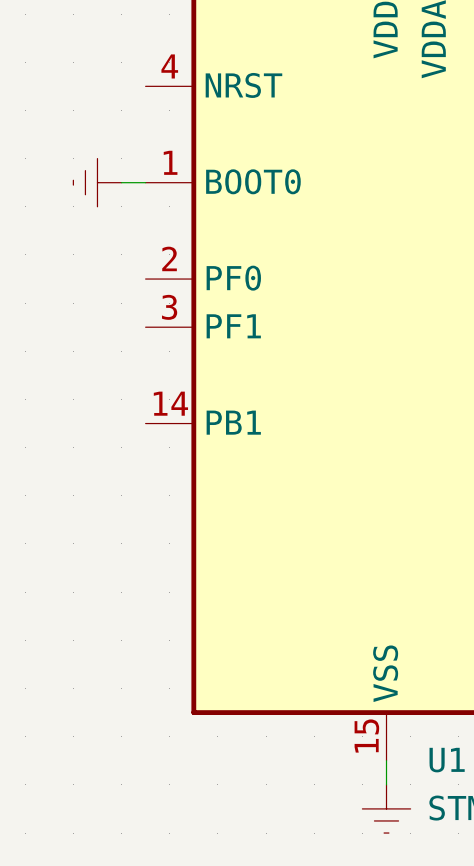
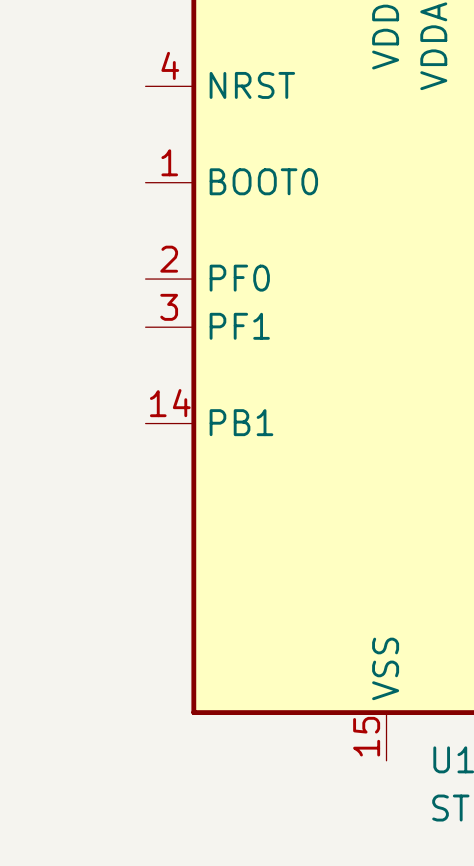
power symbol: (97, 182) -> none
wire: (121, 182) (145, 182) -> none
wire: (386, 760) (386, 784) -> none
power symbol: (386, 808) -> none

